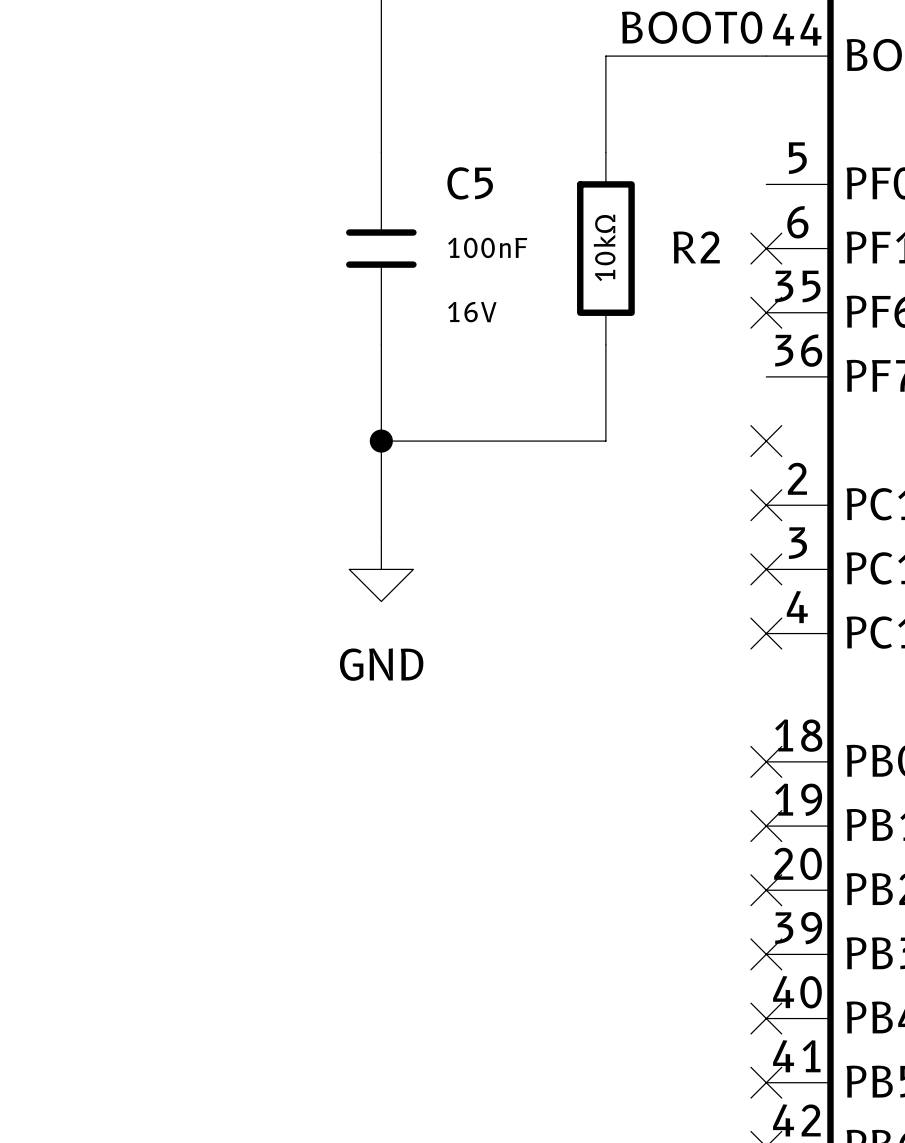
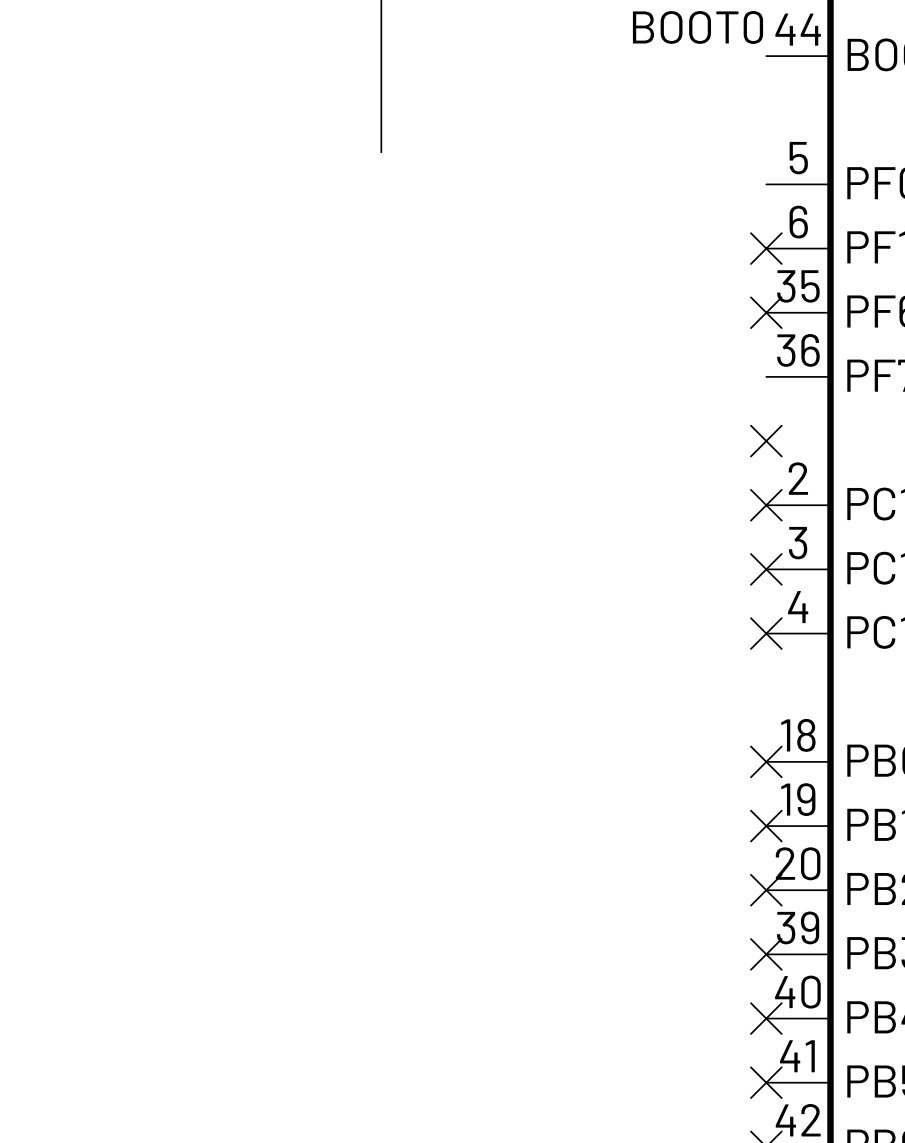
wire: (766, 56) (605, 56) (605, 152) -> none
C5: 100nF (381, 248) -> none
R2: 10kΩ (605, 248) -> none
wire: (381, 344) (381, 537) -> none
wire: (605, 344) (605, 441) (381, 441) -> none
junction: (381, 441) -> none
power symbol: GND (381, 569) -> none

